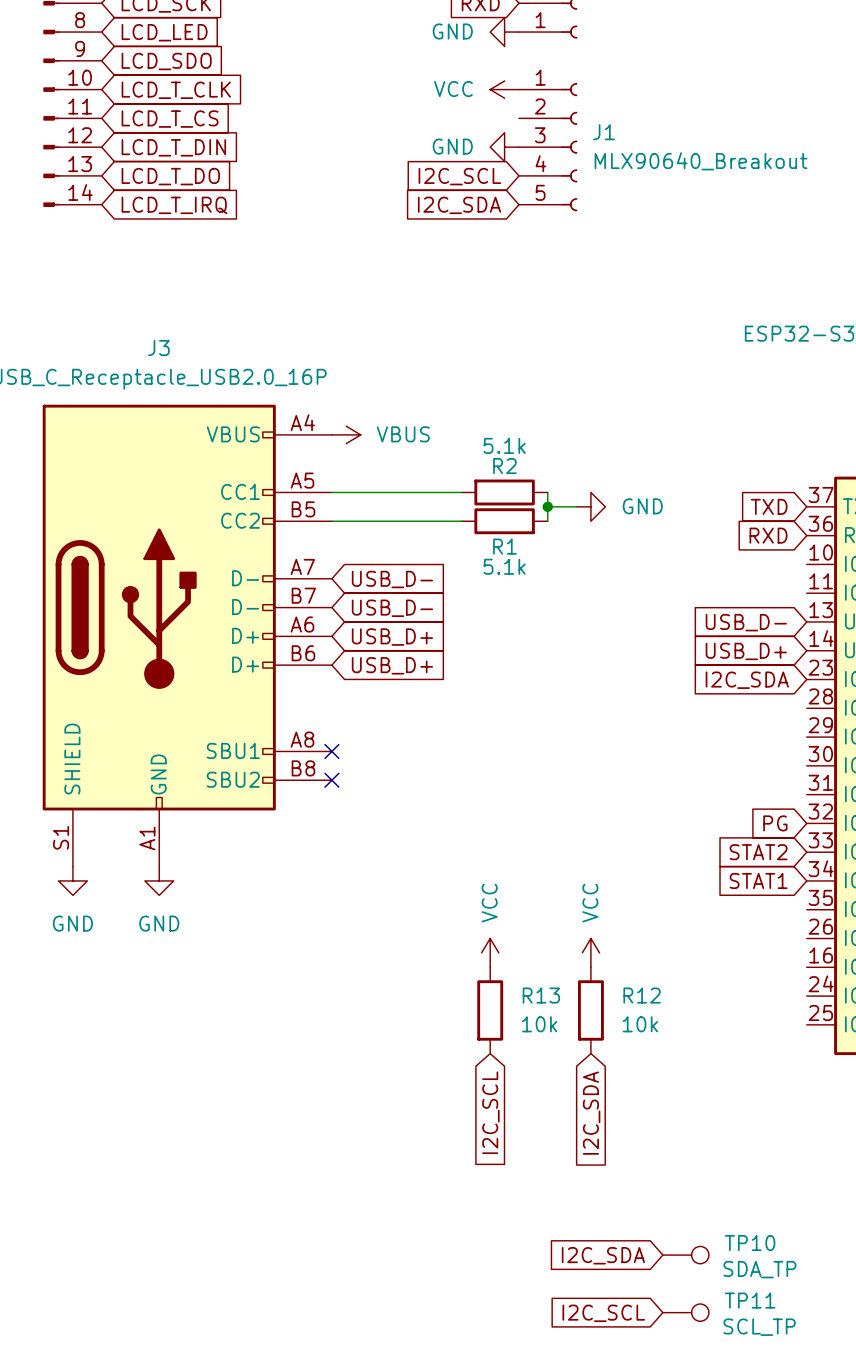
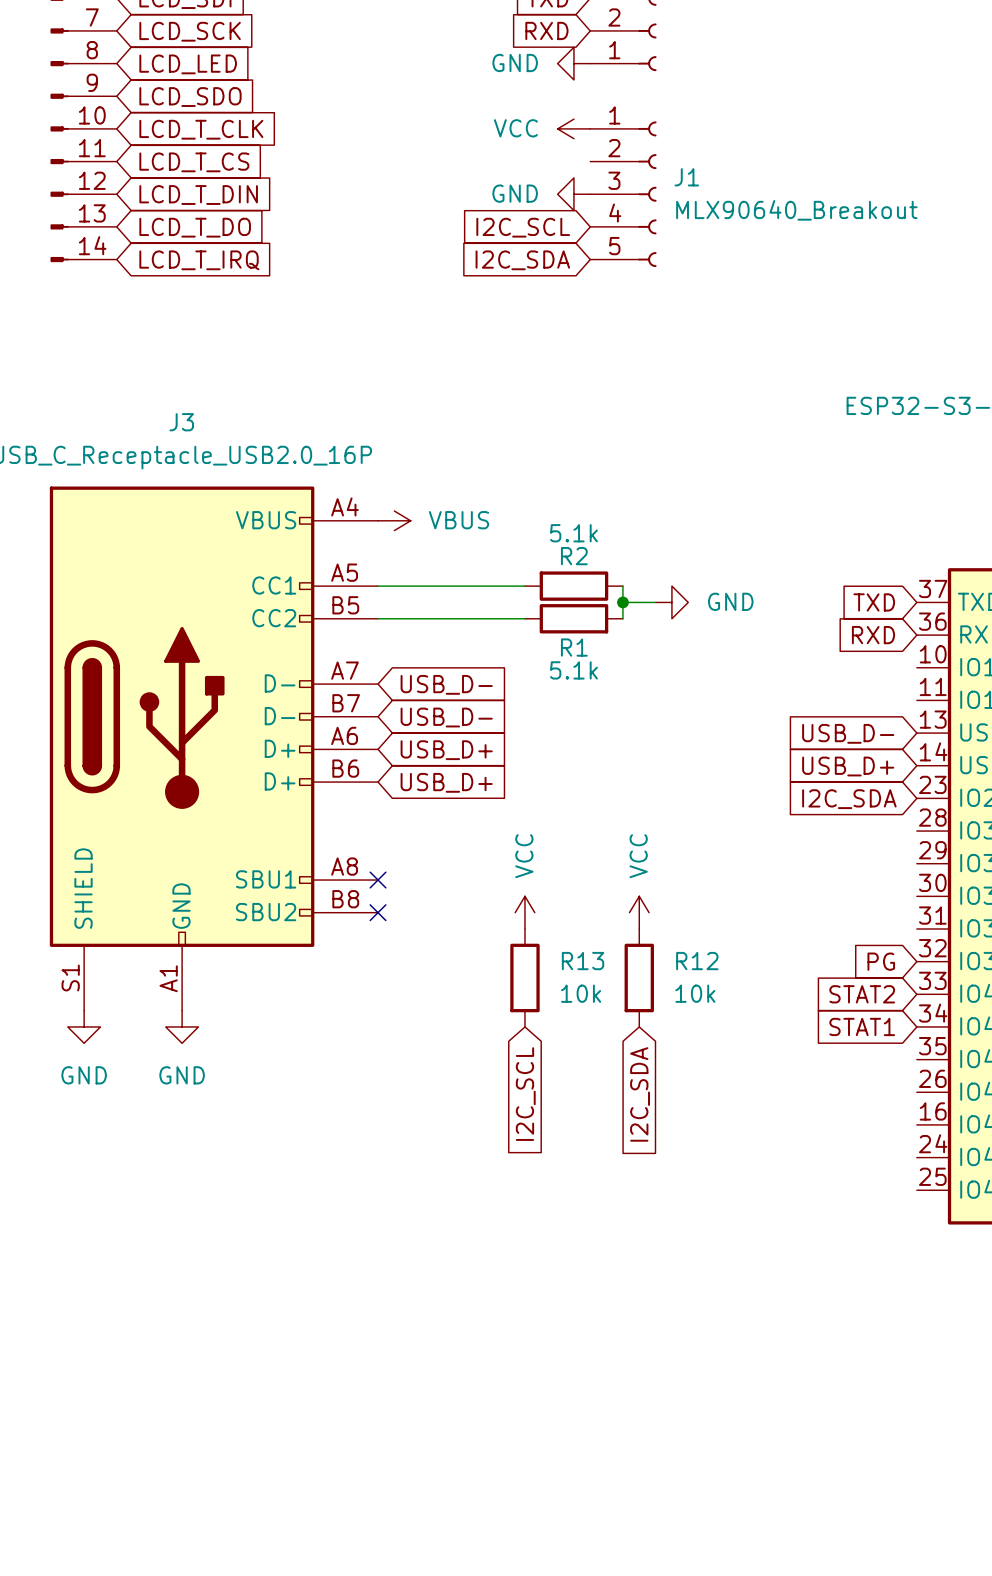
power symbol: none -> VCC (524, 912)
power symbol: none -> VCC (639, 912)
power symbol: VCC (490, 952) -> none
power symbol: VCC (590, 952) -> none
R13 position: (490, 1010) -> (524, 977)
R12 position: (590, 1010) -> (639, 977)
global label position: I2C_SCL (490, 1112) -> I2C_SCL (525, 1094)
global label position: I2C_SDA (591, 1113) -> I2C_SDA (640, 1094)
global label: I2C_SDA (603, 1255) -> none
TP10: SDA_TP (685, 1255) -> none
TP11: SCL_TP (685, 1312) -> none
global label: I2C_SCL (603, 1313) -> none

